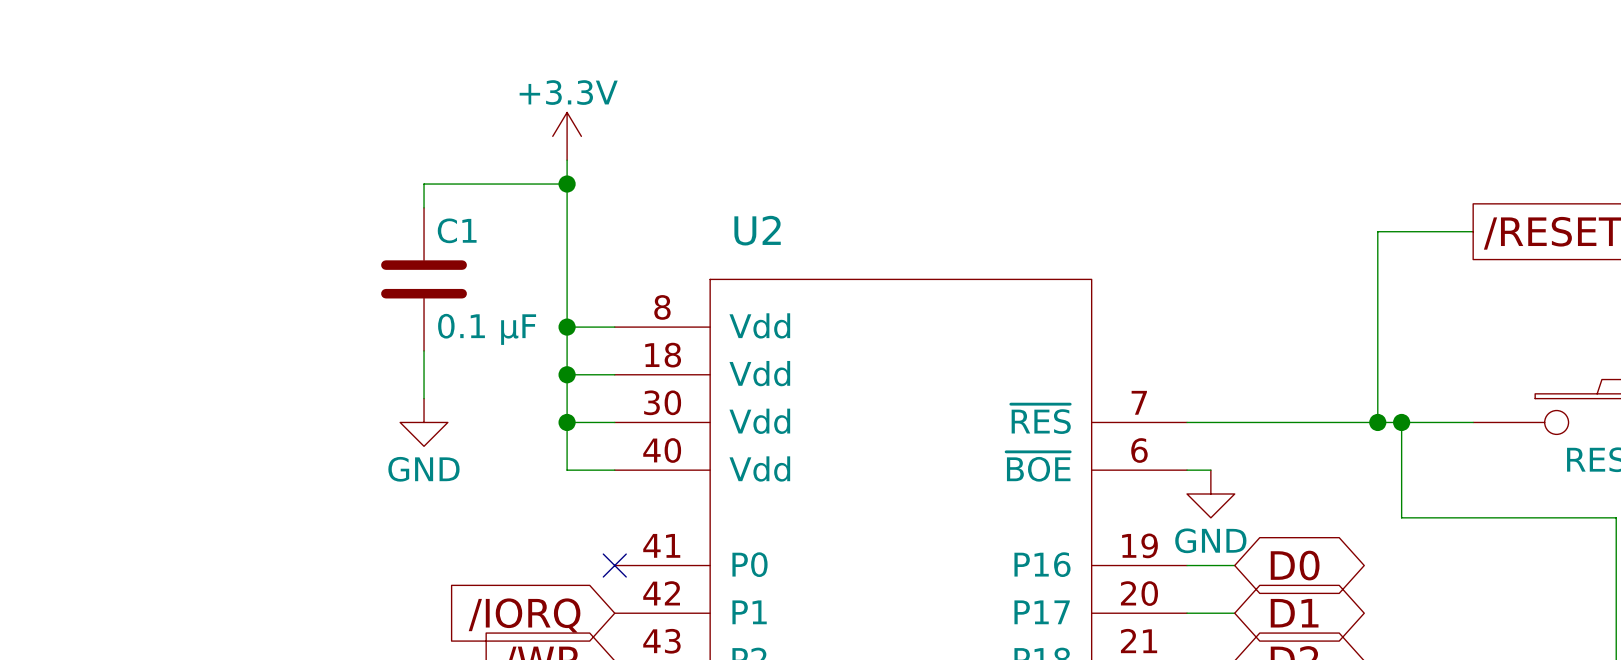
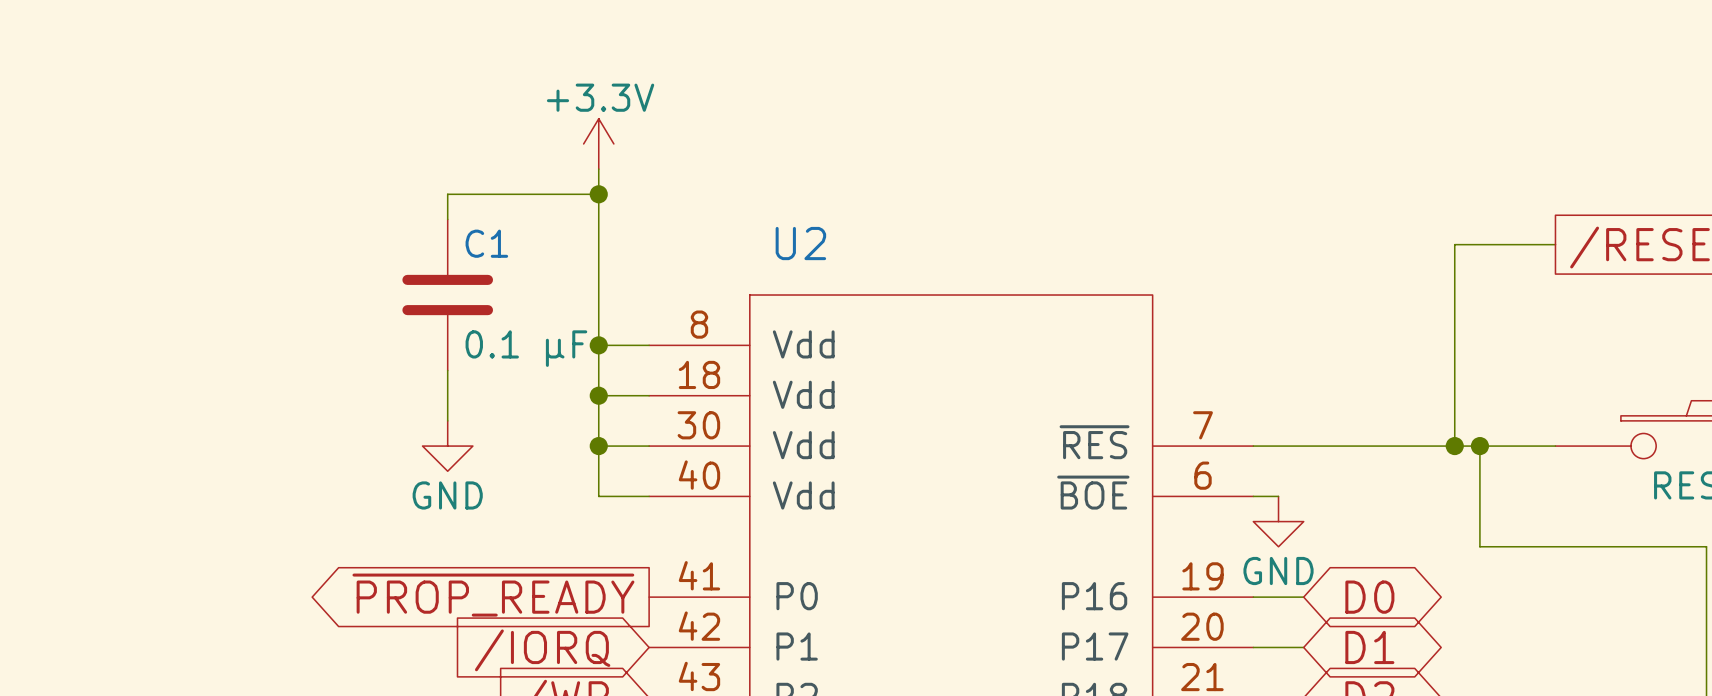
no-connect mark: (614, 565) -> none
global label: none -> ~{PROP_READY} (493, 595)

